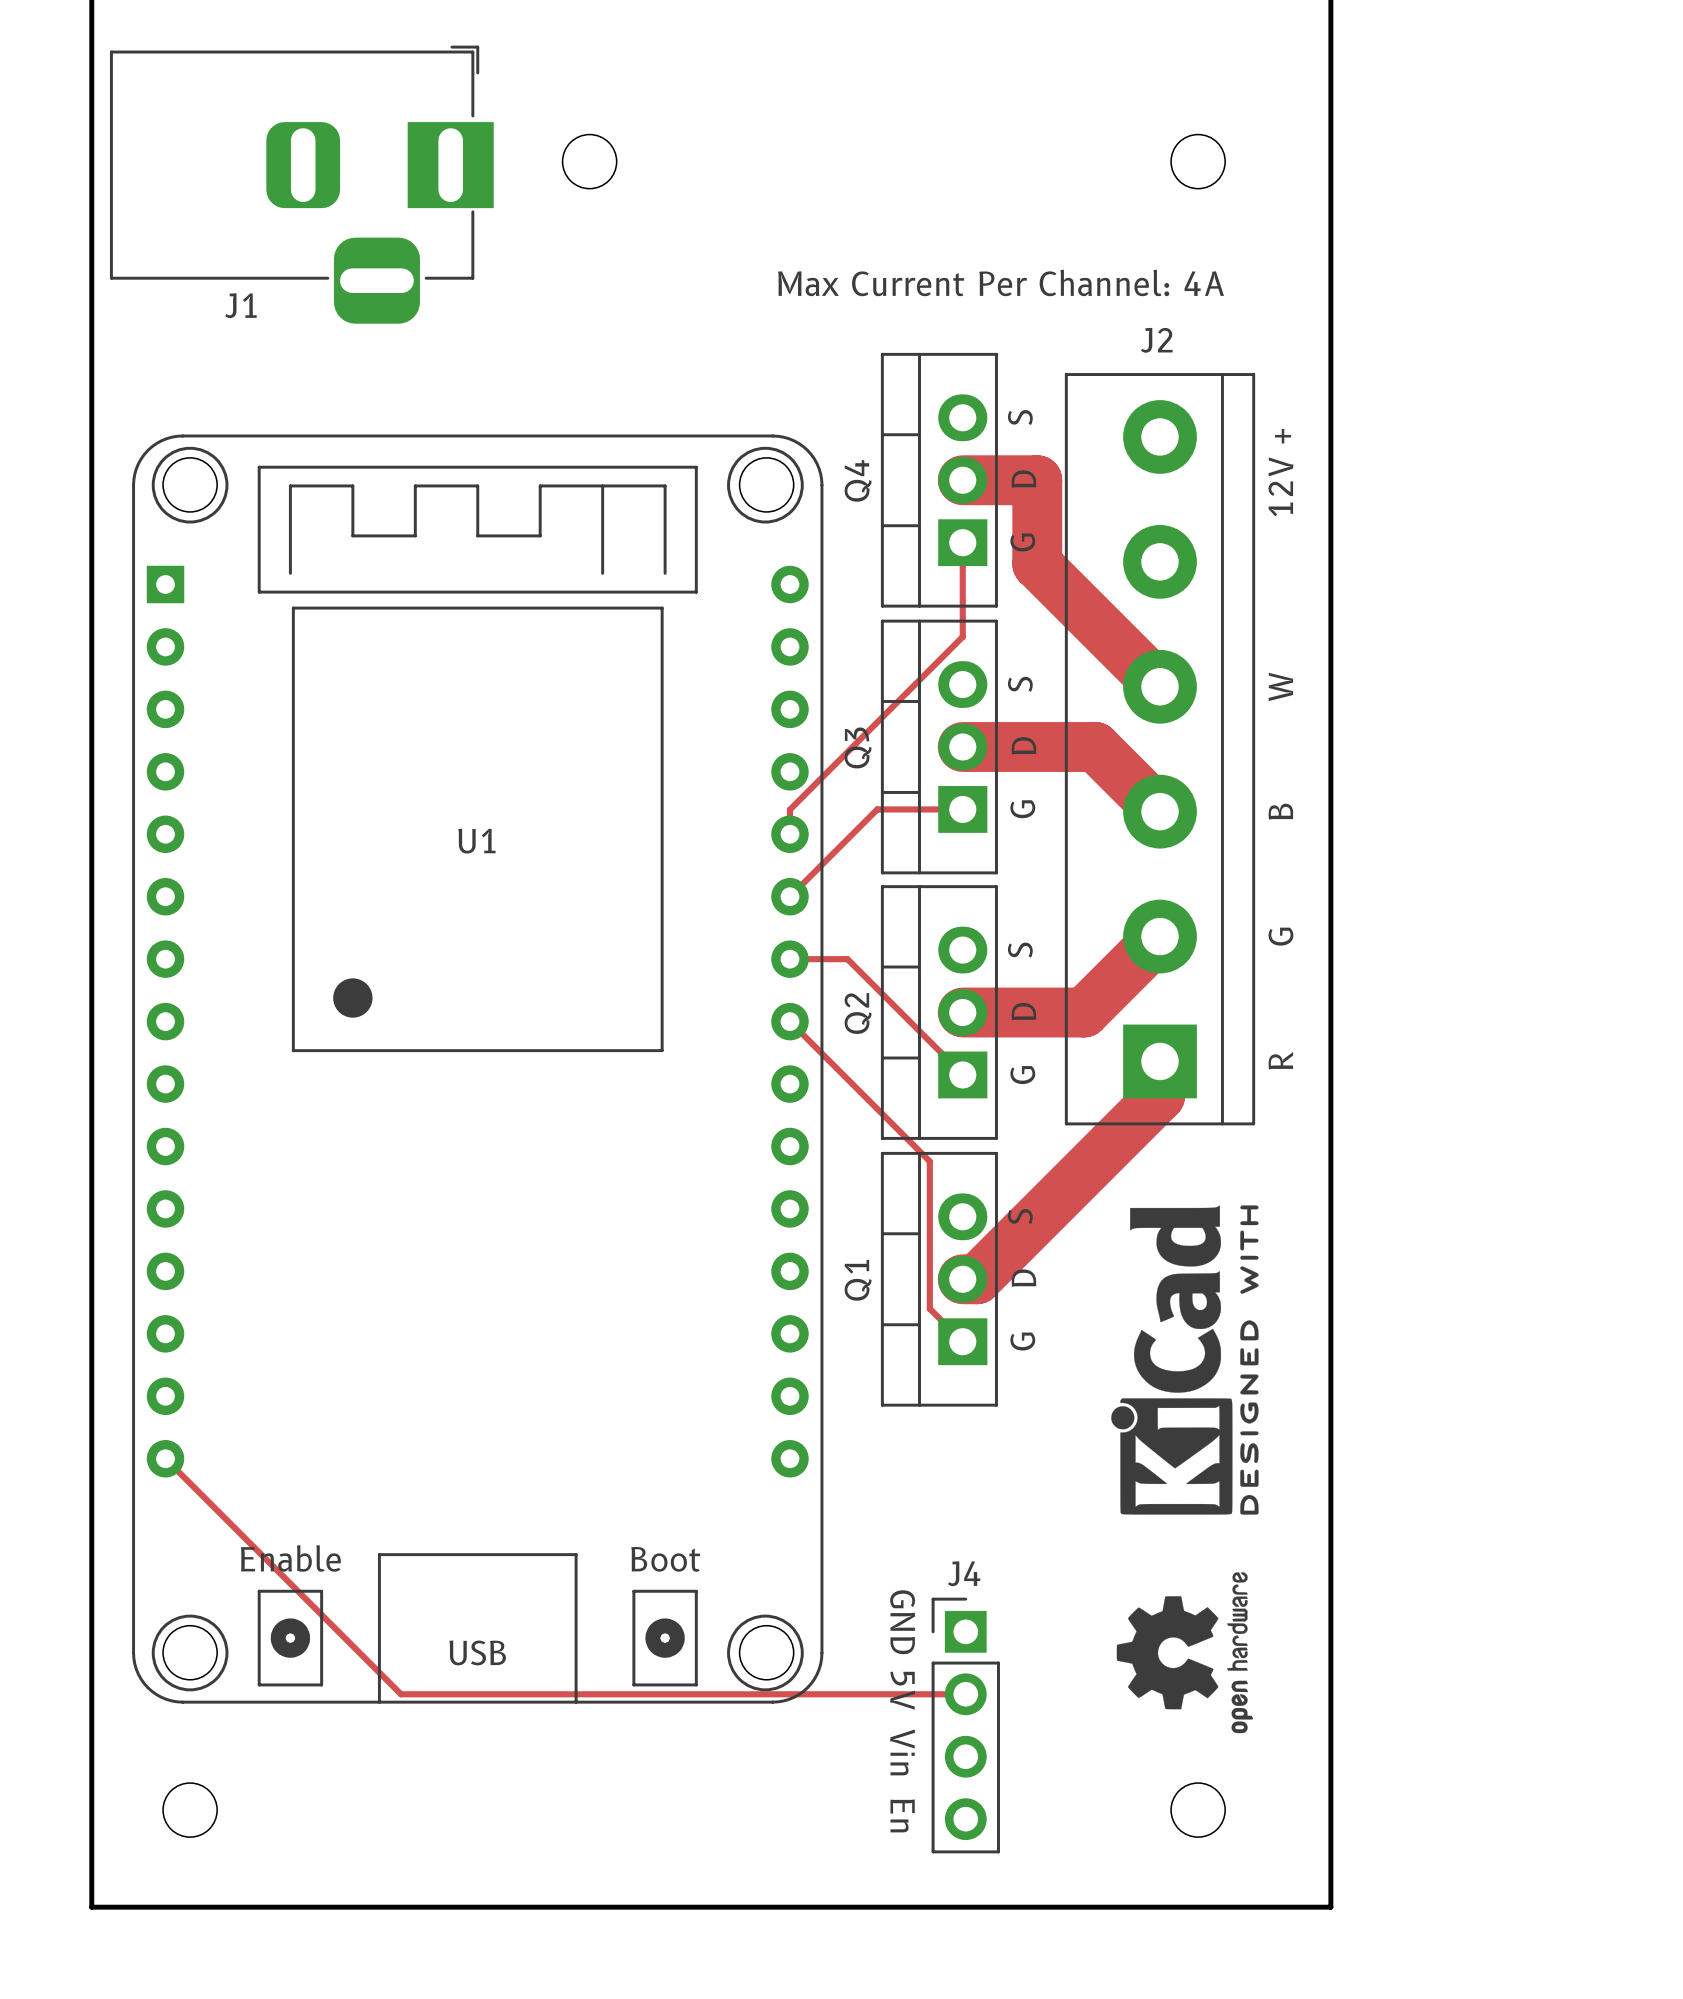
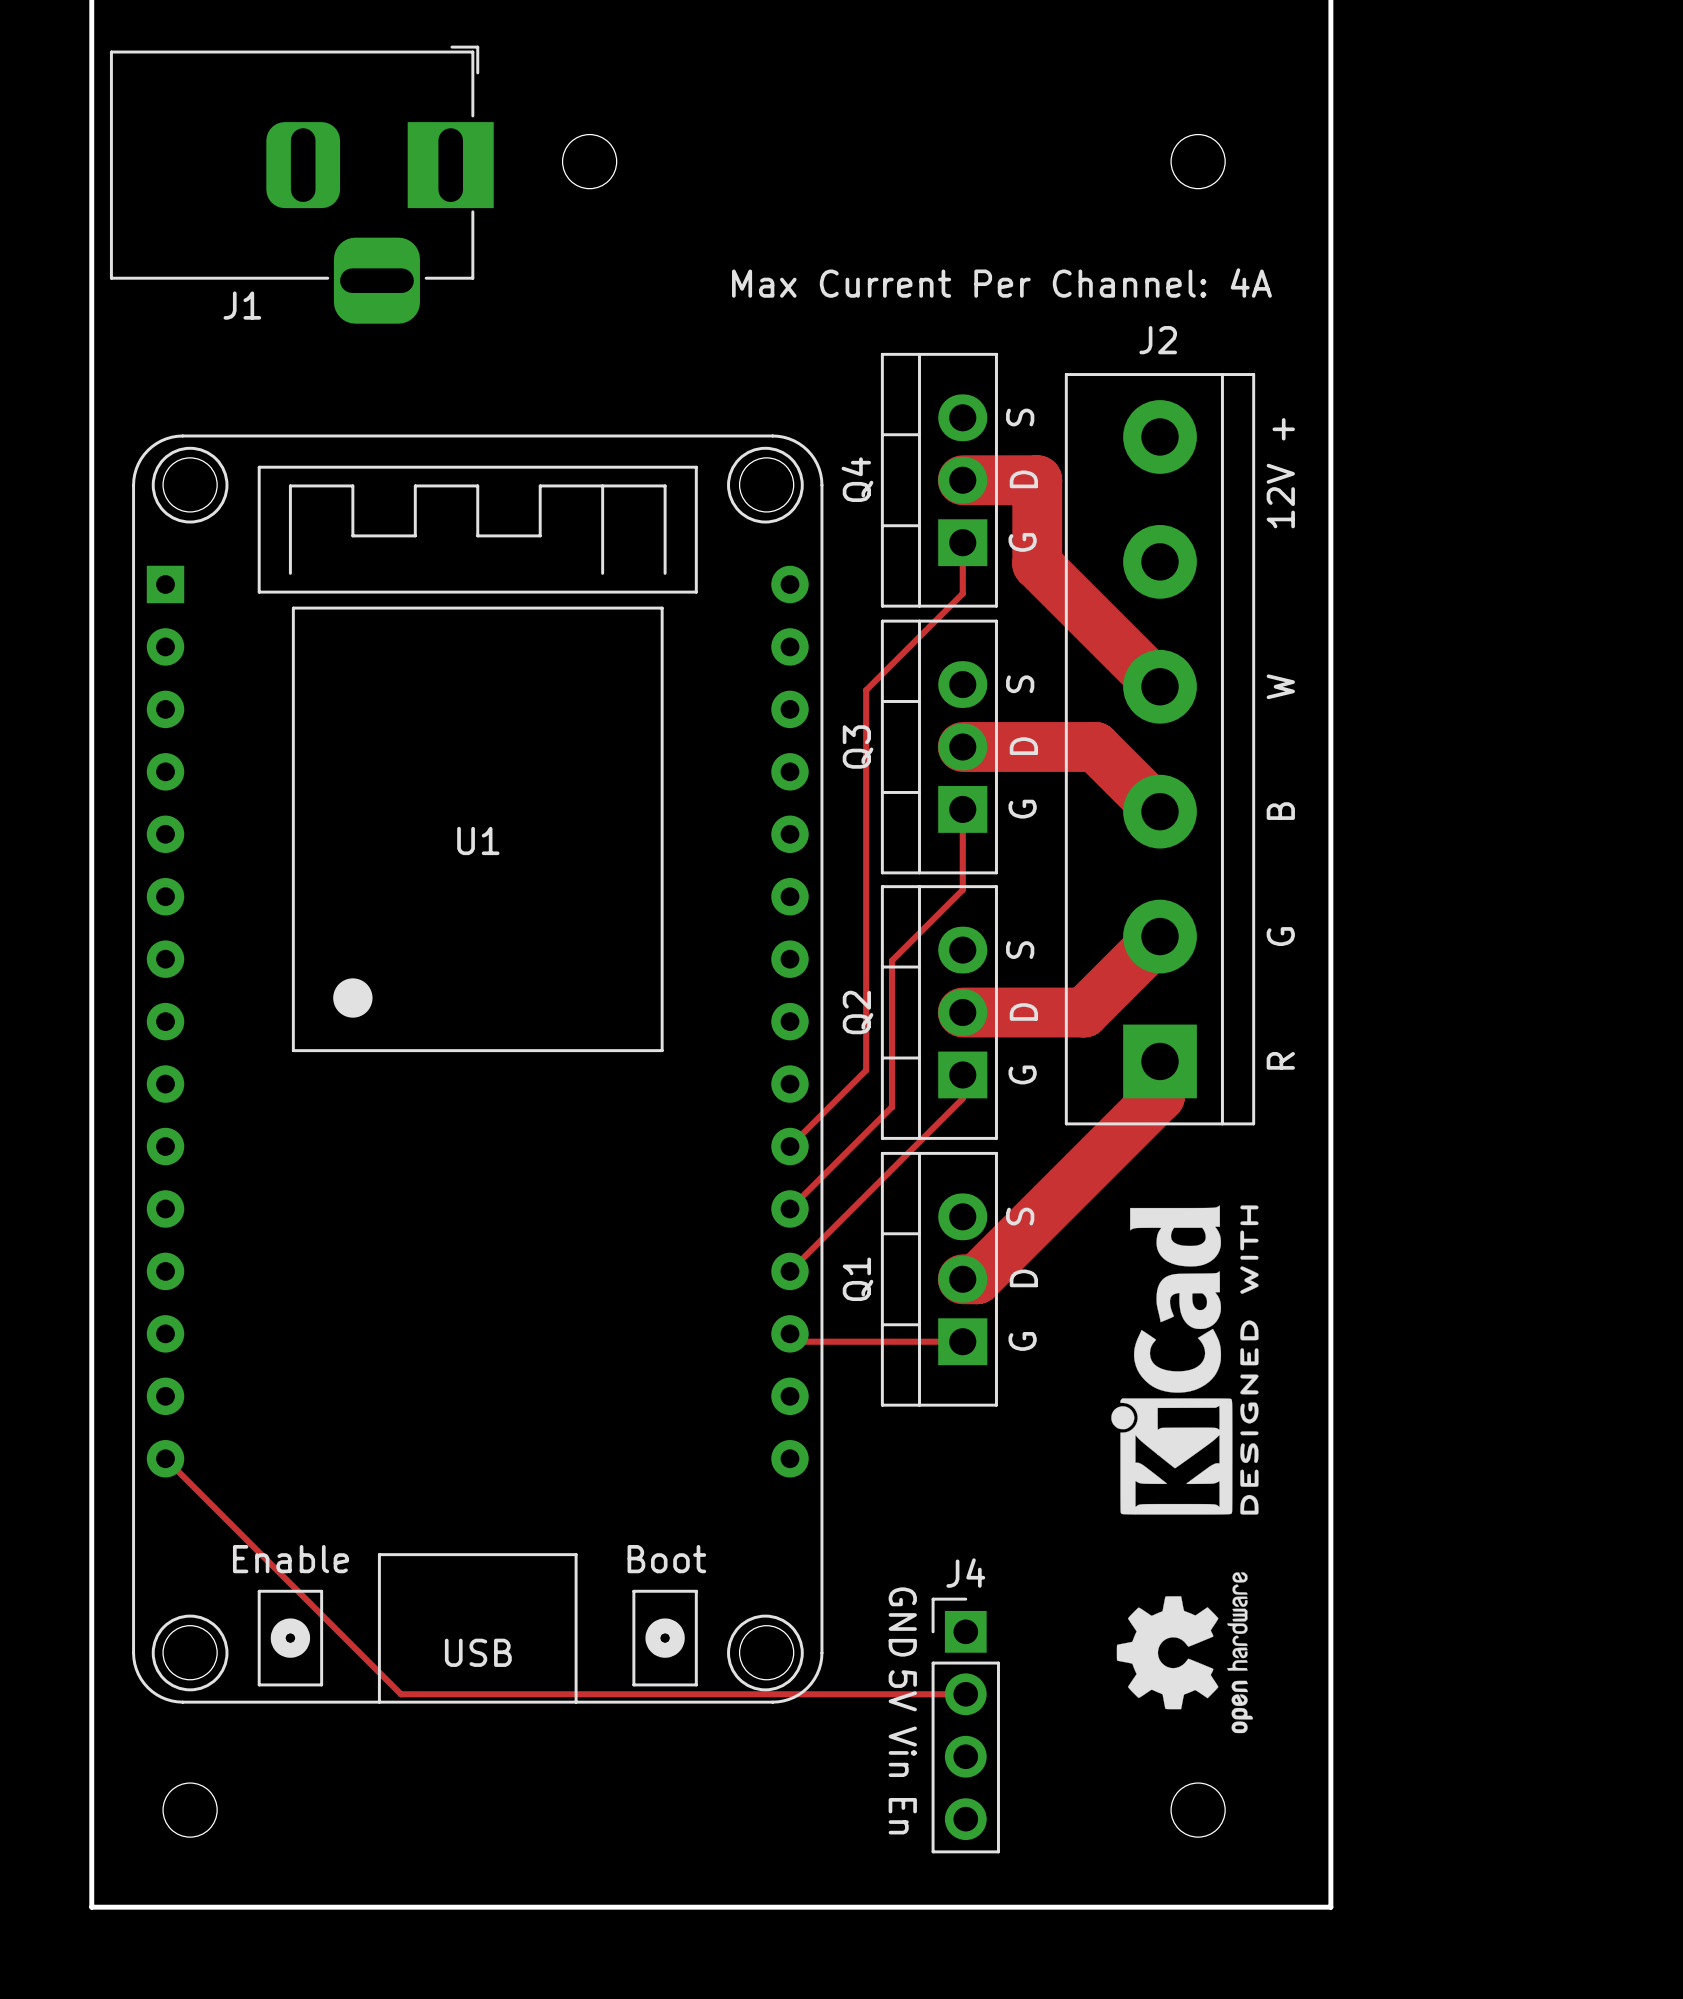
track: (962, 593) (962, 636) (789, 809) (789, 834) -> (962, 593) (866, 690) (866, 1070) (789, 1146)
track: (962, 809) (877, 809) (789, 896) -> (962, 809) (962, 889) (892, 960) (892, 1106) (789, 1208)
track: (789, 959) (847, 959) (962, 1074) -> (789, 1271) (962, 1098) (962, 1074)
track: (789, 1021) (929, 1161) (929, 1308) (962, 1341) -> (789, 1333) (797, 1341) (962, 1341)

